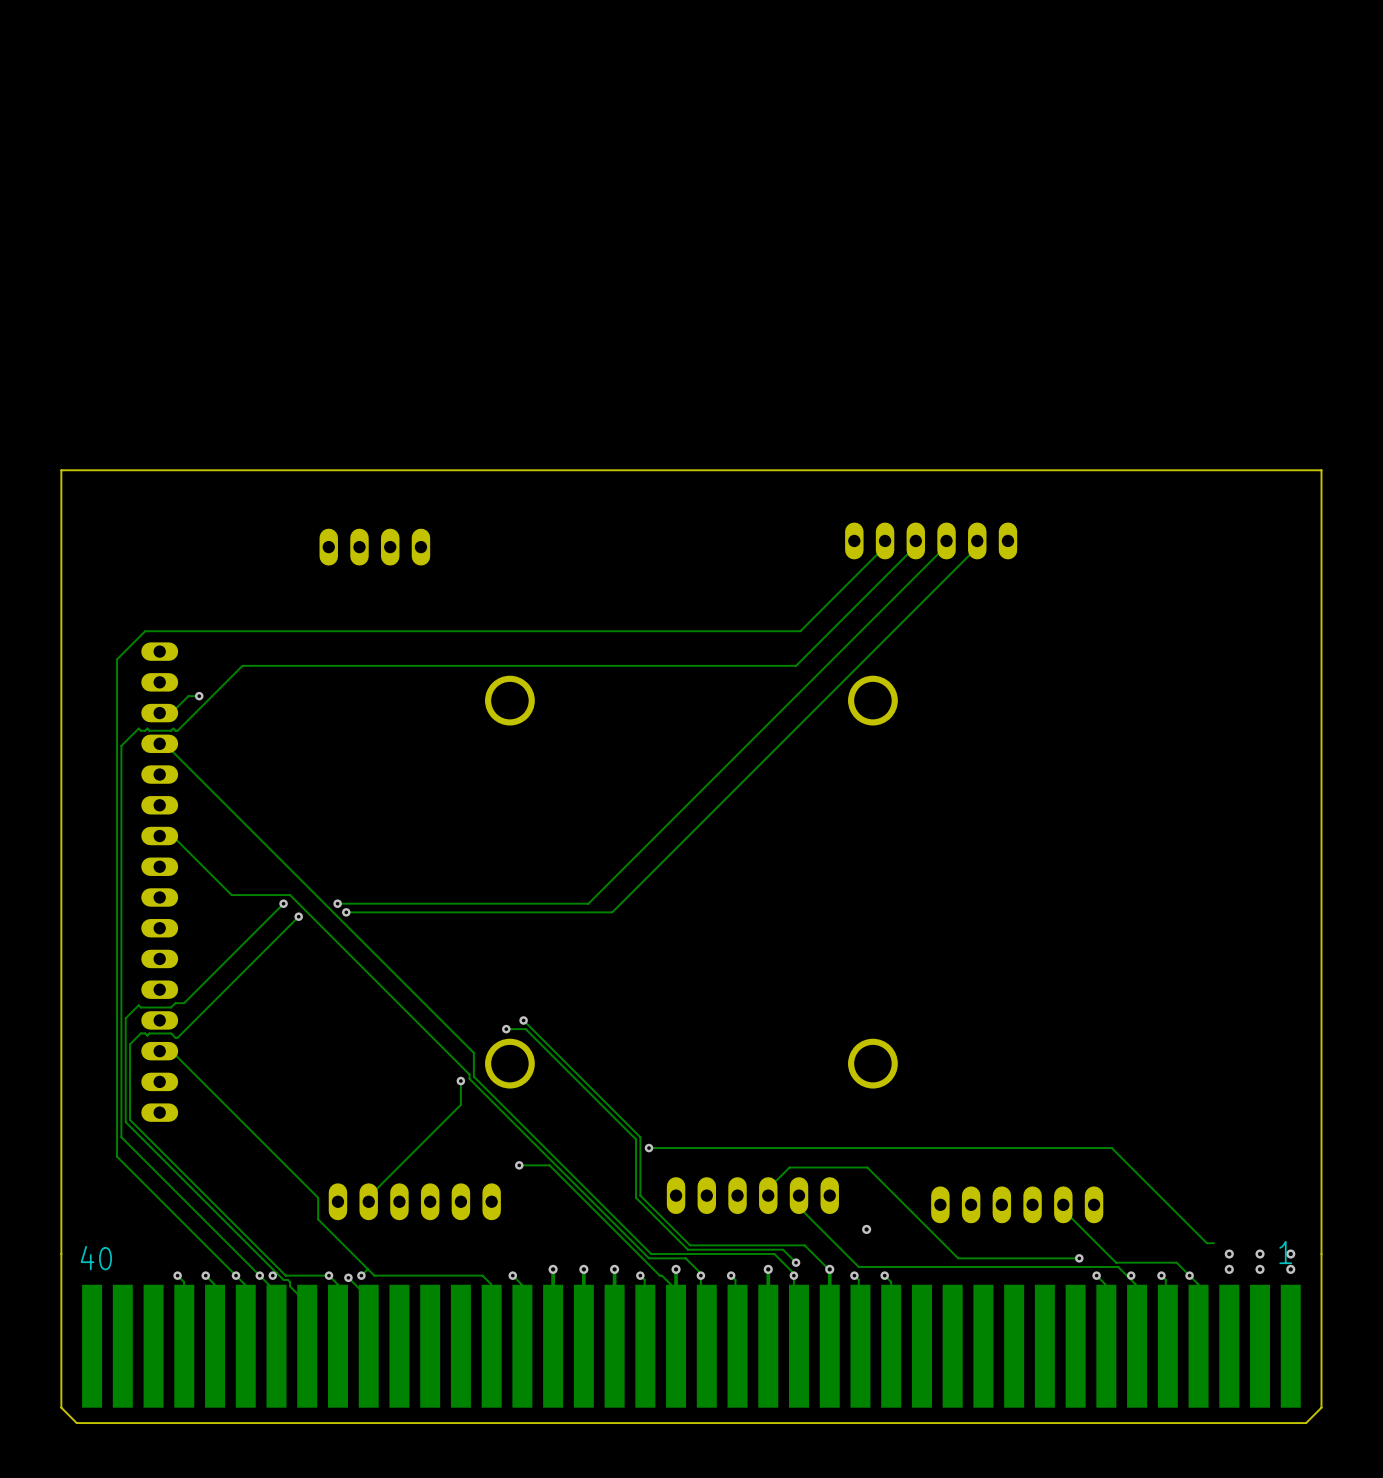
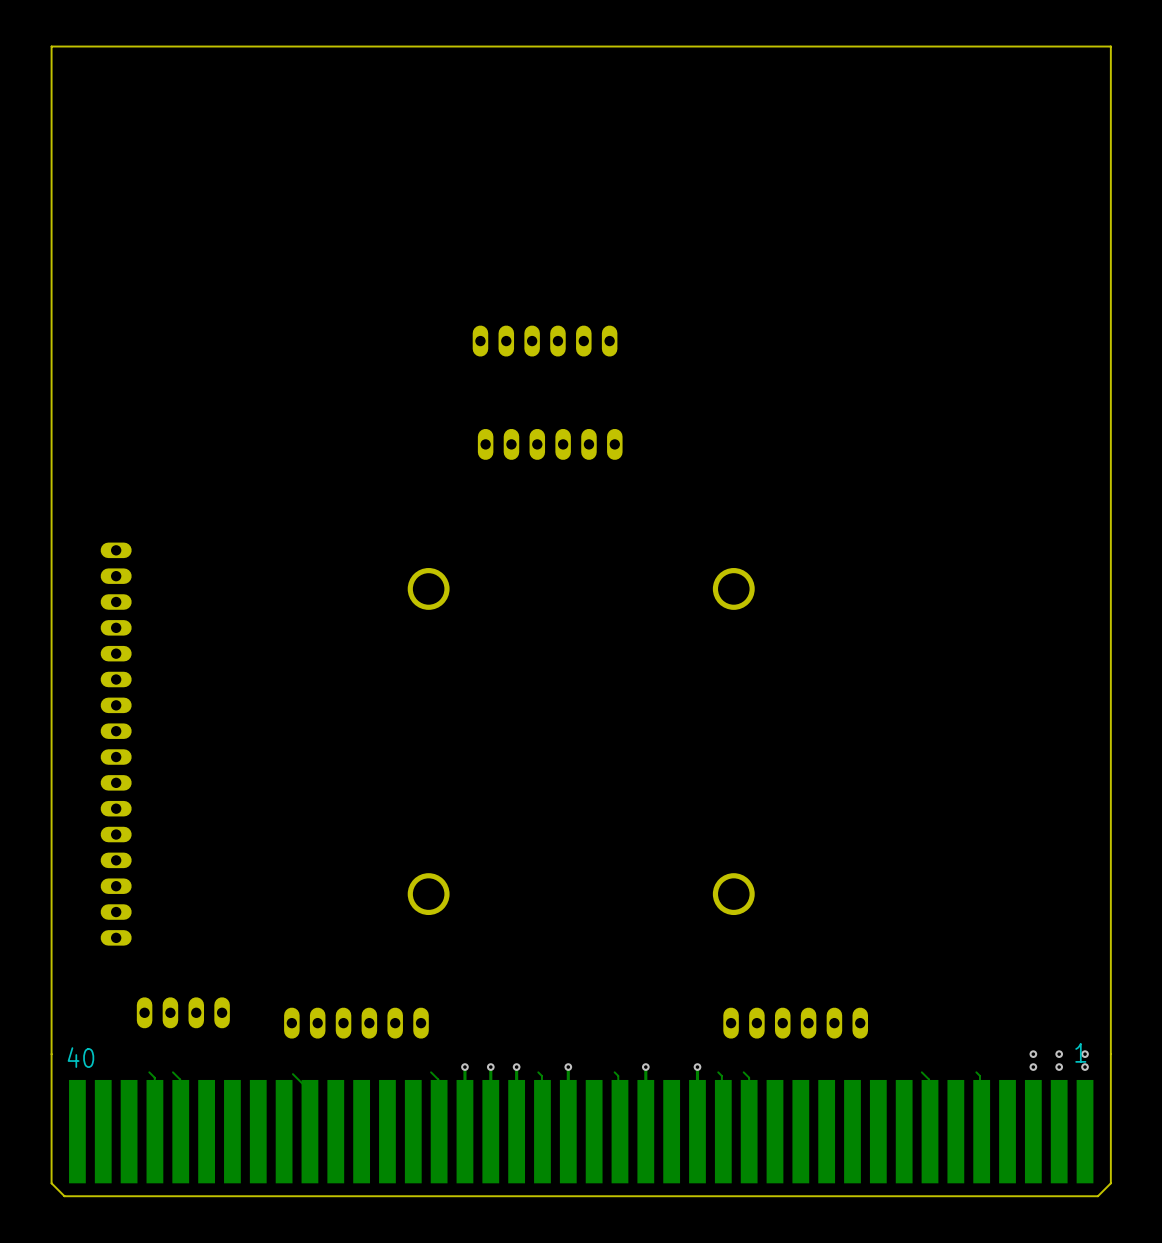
part: none -> (545, 341)
board edge: (1321, 470) (61, 470) -> (1110, 395) (1110, 46) (51, 46) (51, 395)
part: none -> (550, 444)
track: (885, 540) (884, 546) (800, 631) (145, 631) (117, 659) (117, 1156) (244, 1284) (245, 1346) -> none
track: (915, 540) (914, 546) (796, 665) (242, 665) (177, 730) (173, 728) (171, 730) (149, 730) (147, 728) (140, 730) (138, 728) (121, 745) (121, 1137) (274, 1290) (274, 1344) (276, 1346) -> none
part: (931, 540) -> none
track: (946, 540) (945, 546) (588, 903) (337, 903) -> none
track: (977, 540) (975, 549) (612, 912) (346, 912) -> none
part: (374, 547) -> none
track: (199, 696) (188, 696) (173, 711) (160, 711) (159, 713) -> none
via: (199, 696) -> none
track: (159, 743) (160, 745) (166, 745) (473, 1052) (473, 1076) (651, 1254) (774, 1254) (793, 1273) (793, 1340) (799, 1346) -> none
track: (159, 836) (173, 836) (231, 895) (290, 895) (469, 1074) (469, 1078) (649, 1258) (685, 1258) (700, 1273) (700, 1340) (706, 1346) -> none
part position: (159, 882) -> (116, 744)
track: (283, 903) (184, 1003) (175, 1003) (171, 1007) (140, 1007) (138, 1005) (125, 1018) (125, 1122) (283, 1279) (290, 1282) (290, 1286) (305, 1301) (305, 1344) (307, 1346) -> none
via: (283, 903) -> none
via: (337, 903) -> none
via: (346, 912) -> none
track: (298, 916) (177, 1037) (171, 1033) (149, 1033) (147, 1035) (140, 1033) (130, 1044) (130, 1119) (285, 1275) (328, 1275) (337, 1284) (337, 1346) -> none
via: (298, 916) -> none
track: (523, 1020) (640, 1137) (640, 1195) (690, 1245) (804, 1245) (829, 1269) -> none
via: (523, 1020) -> none
track: (506, 1029) (525, 1029) (636, 1139) (636, 1197) (687, 1249) (783, 1249) (796, 1262) -> none
via: (506, 1029) -> none
track: (159, 1051) (160, 1052) (173, 1052) (318, 1197) (318, 1219) (374, 1275) (482, 1275) (491, 1284) (491, 1346) -> none
track: (460, 1081) (460, 1104) (370, 1195) (368, 1201) -> none
via: (460, 1081) -> none
track: (649, 1148) (1111, 1148) (1206, 1243) (1213, 1243) -> none
via: (649, 1148) -> none
track: (519, 1165) (549, 1165) (674, 1288) (676, 1346) -> none
via: (519, 1165) -> none
part: (752, 1195) -> none
track: (768, 1195) (770, 1186) (789, 1167) (867, 1167) (958, 1258) (1079, 1258) -> none
track: (799, 1195) (800, 1208) (858, 1266) (1118, 1266) (1135, 1284) (1135, 1344) (1137, 1346) -> none
part position: (414, 1201) -> (356, 1023)
part: none -> (183, 1012)
part position: (1017, 1204) -> (795, 1023)
track: (1063, 1204) (1064, 1210) (1116, 1262) (1176, 1262) (1198, 1284) (1198, 1346) -> none
via: (866, 1229) -> none
via: (1079, 1258) -> none
via: (796, 1262) -> none
track: (367, 1269) (361, 1275) -> none
via: (177, 1275) -> none
via: (205, 1275) -> none
via: (236, 1275) -> none
via: (259, 1275) -> none
via: (272, 1275) -> none
via: (328, 1275) -> none
via: (361, 1275) -> none
via: (512, 1275) -> none
via: (640, 1275) -> none
via: (700, 1275) -> none
via: (731, 1275) -> none
via: (793, 1275) -> none
via: (854, 1275) -> none
via: (884, 1275) -> none
via: (1096, 1275) -> none
via: (1131, 1275) -> none
via: (1161, 1275) -> none
via: (1189, 1275) -> none
via: (348, 1277) -> none

